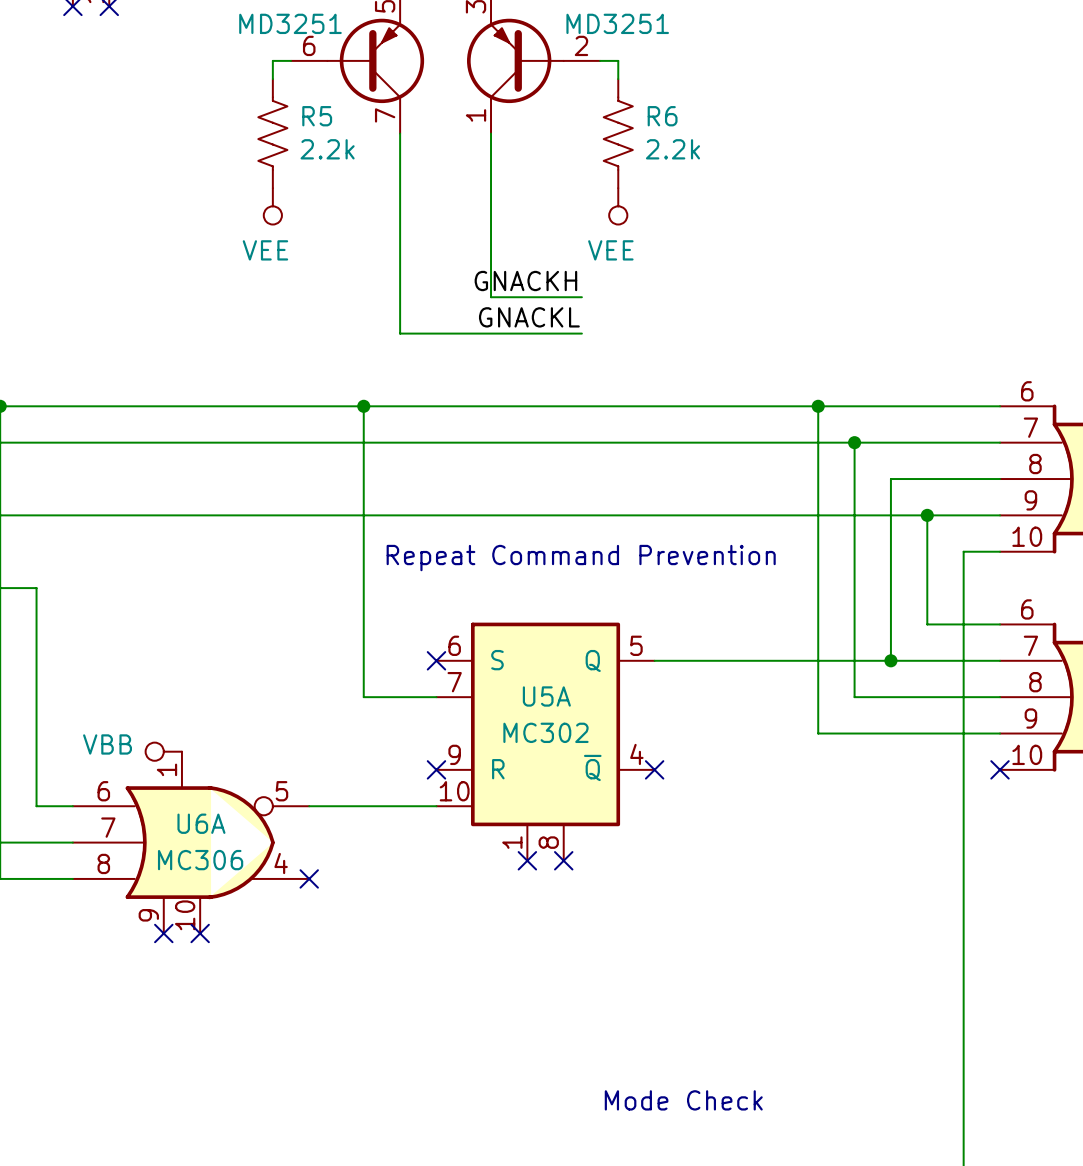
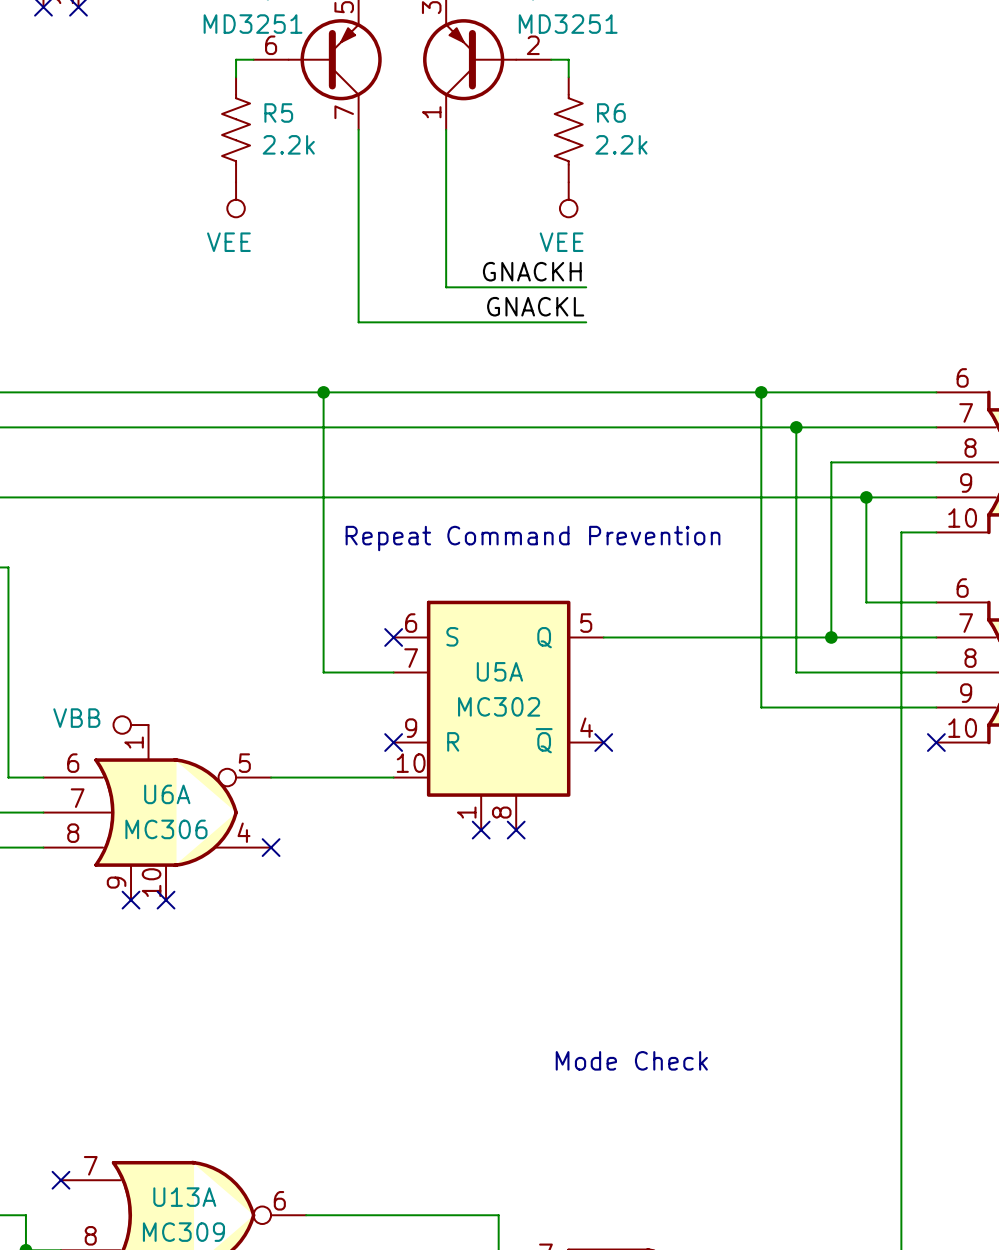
label position: GNACKH (525, 281) -> GNACKH (532, 271)
wire: none -> (533, 287) (586, 287)
label position: GNACKL (529, 317) -> GNACKL (535, 306)
wire: none -> (533, 322) (586, 322)

